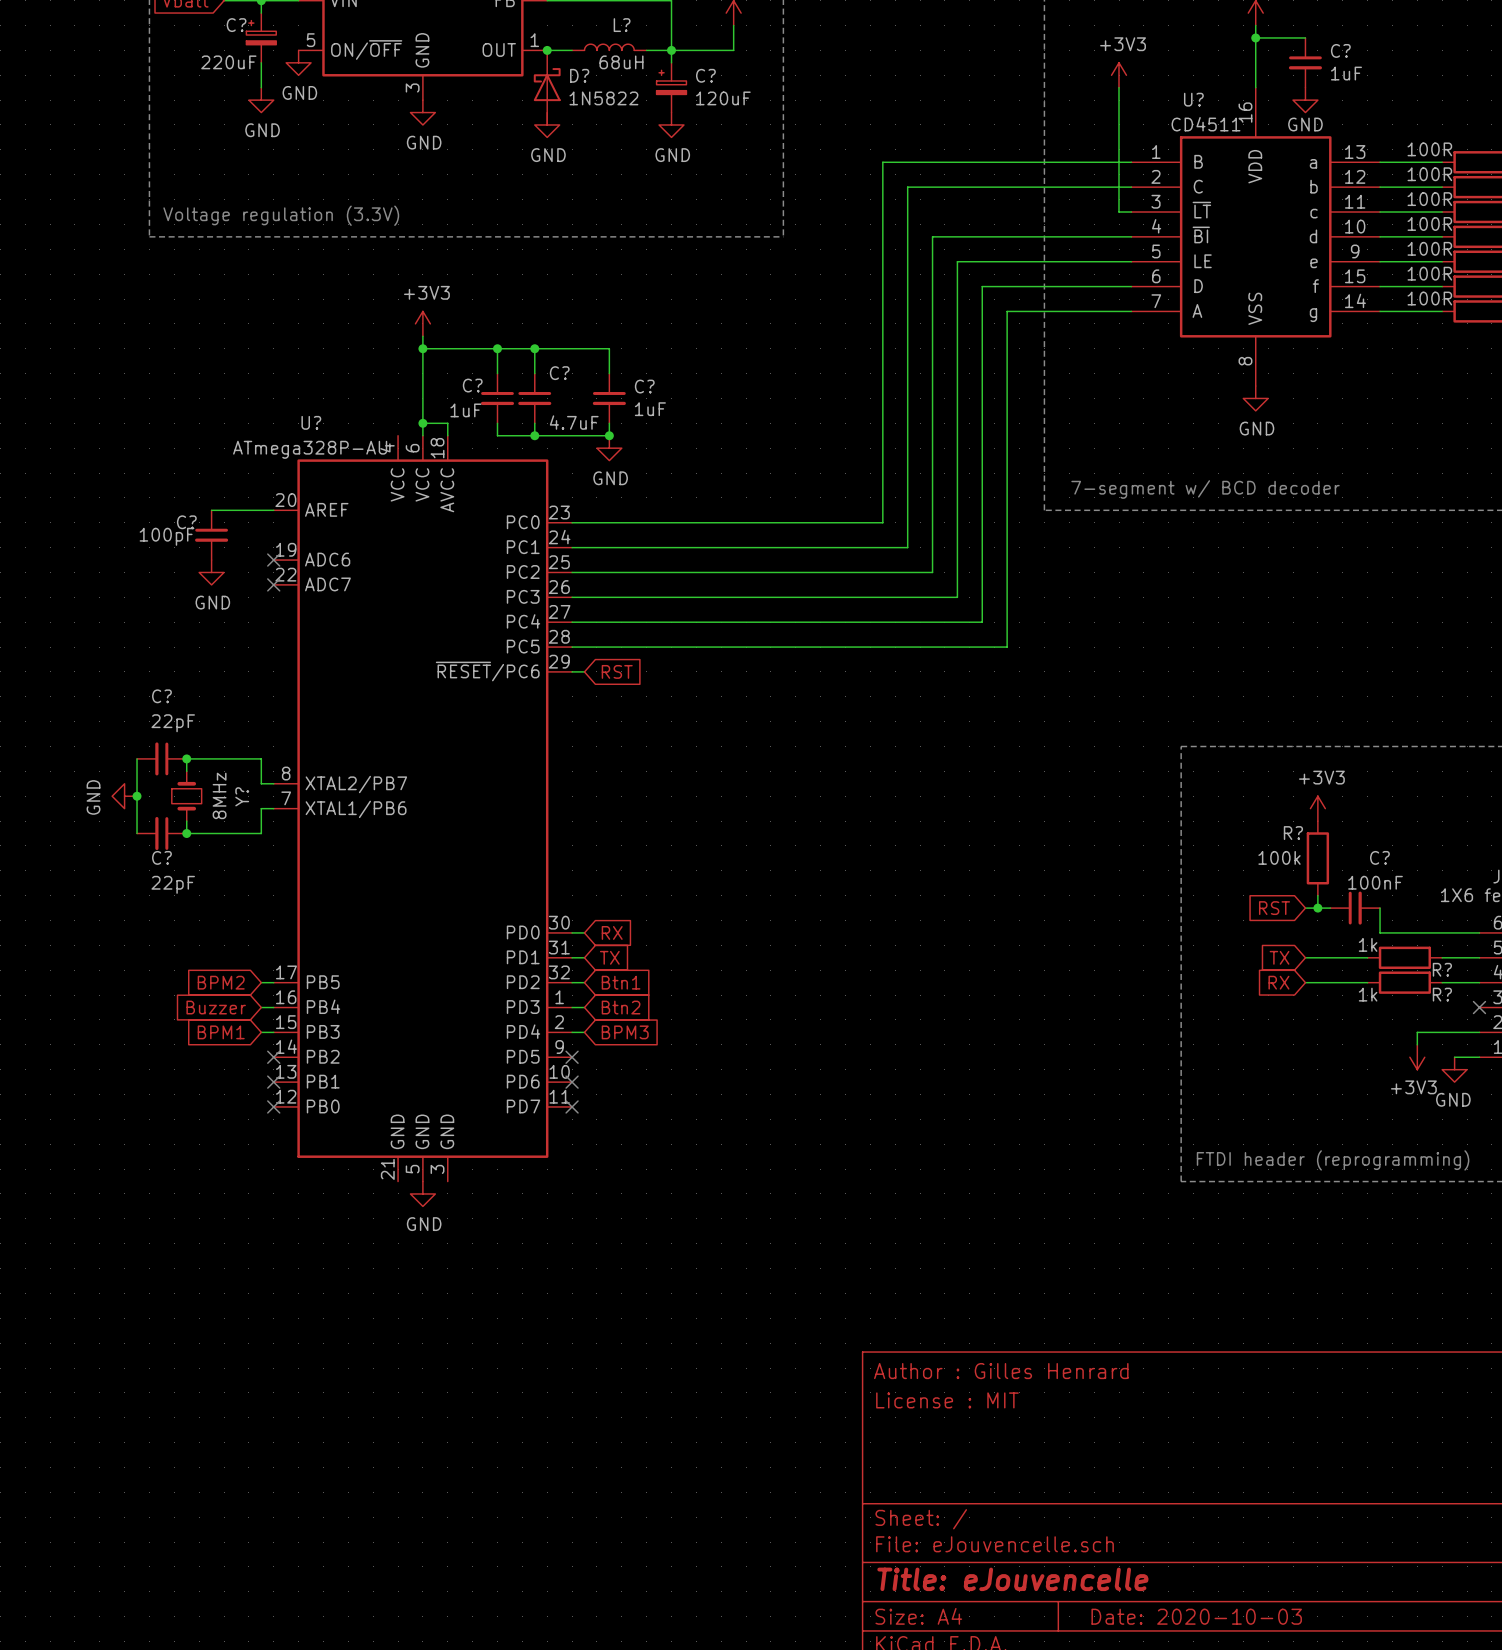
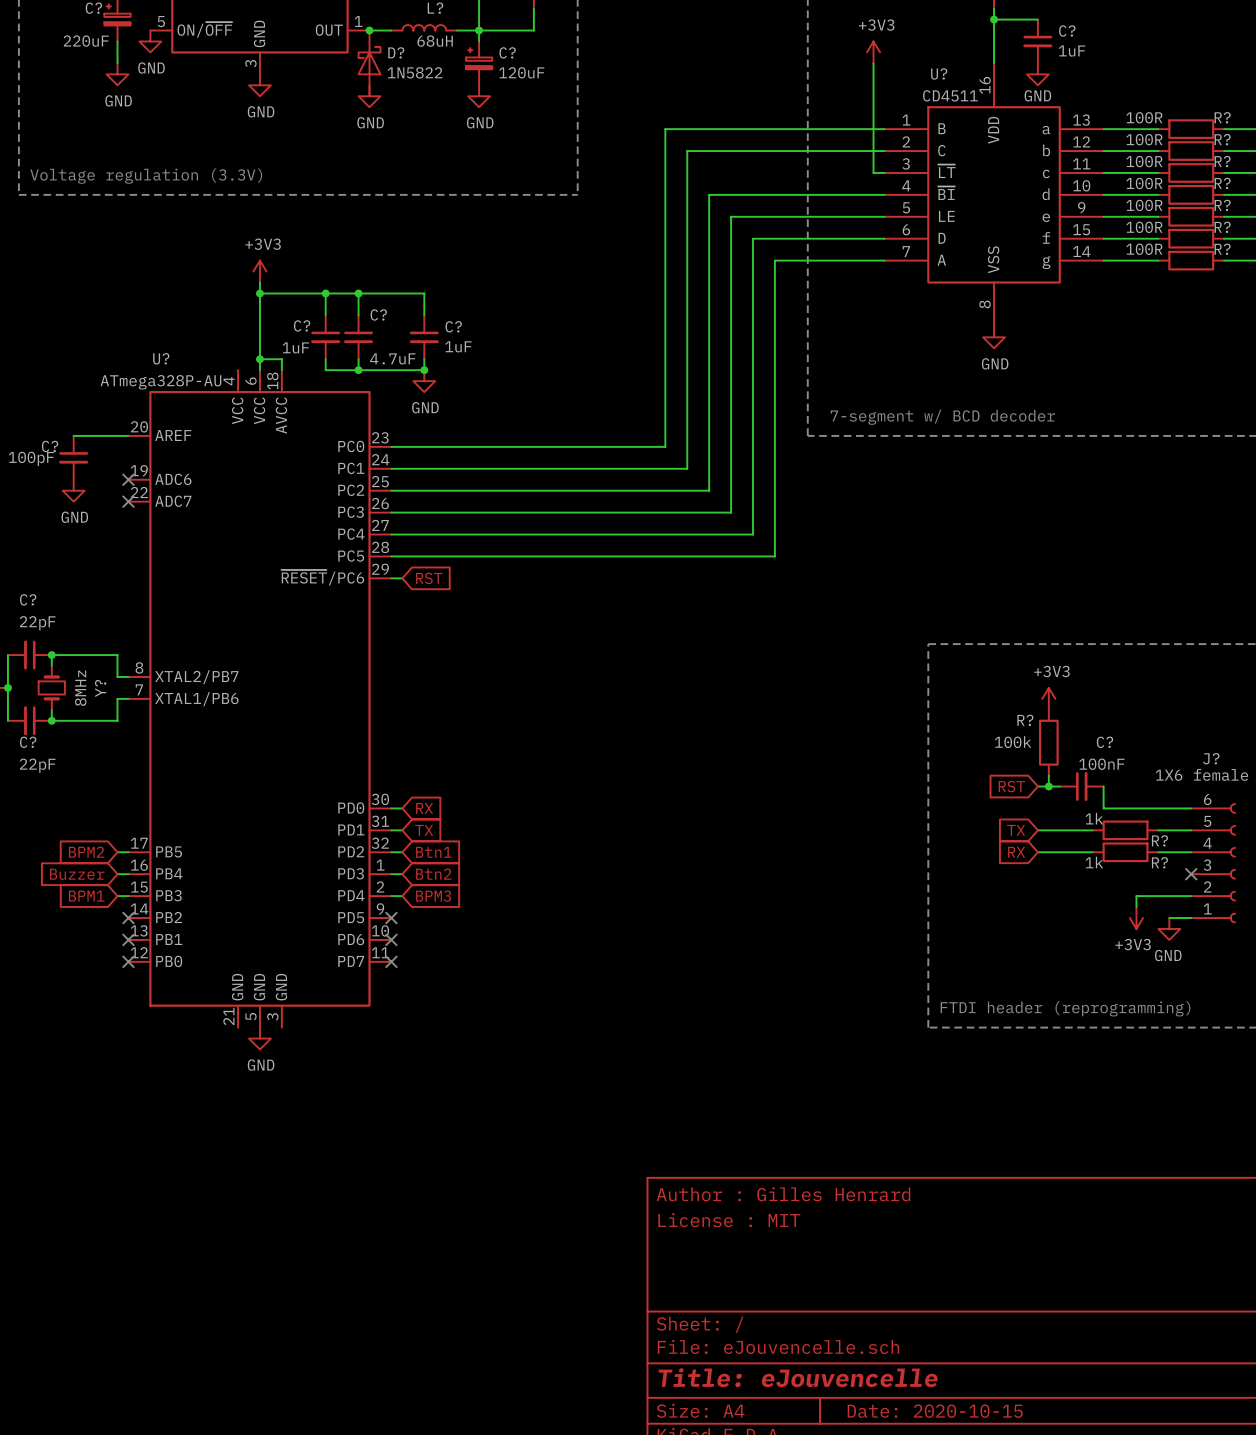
title block: Date: 2020-10-03 (1196, 1616) -> Date: 2020-10-15 (935, 1411)

